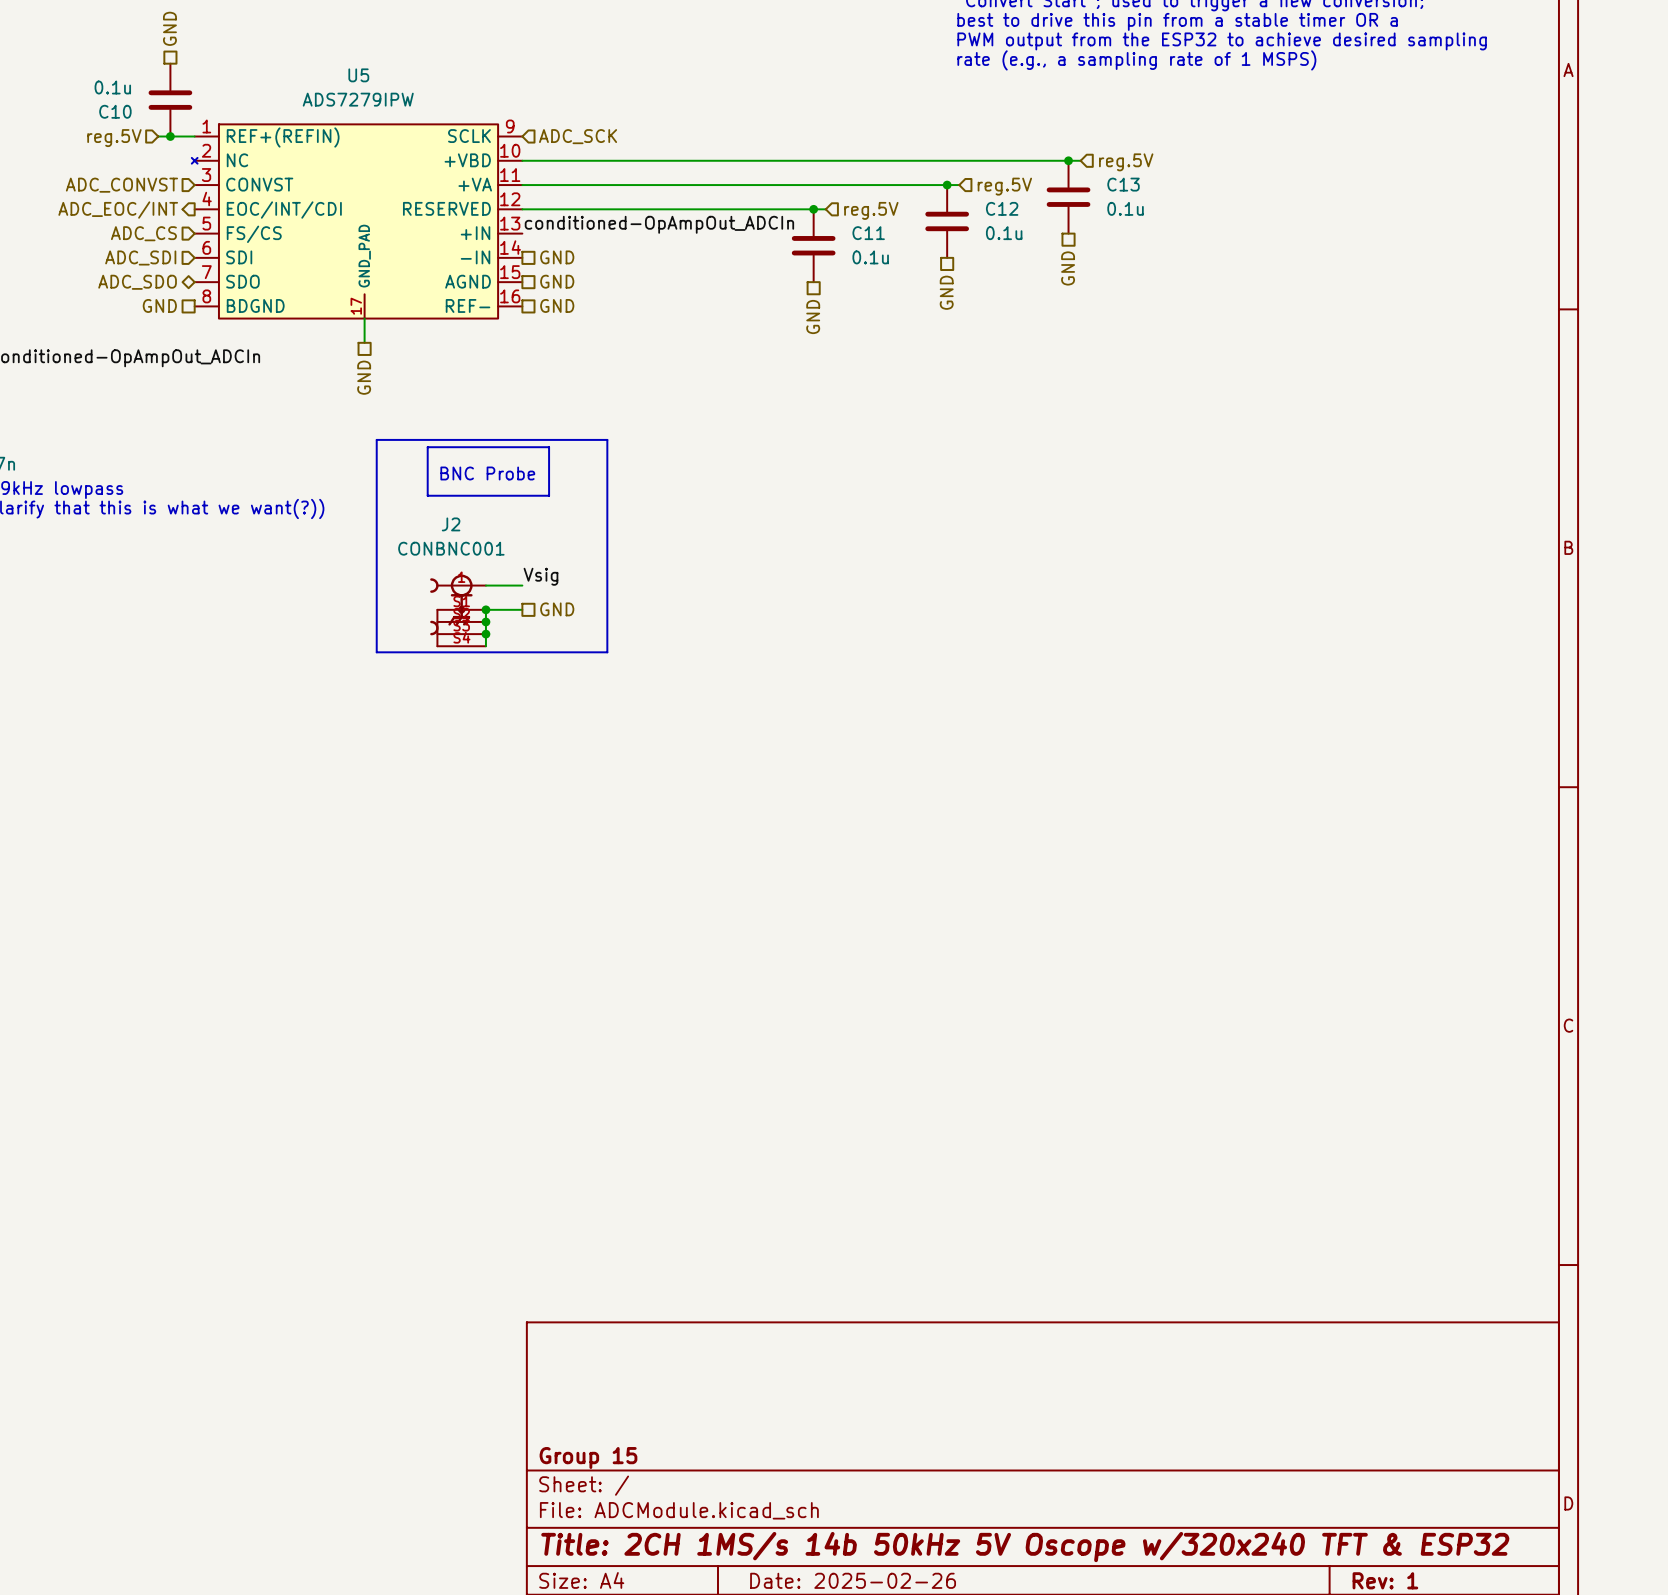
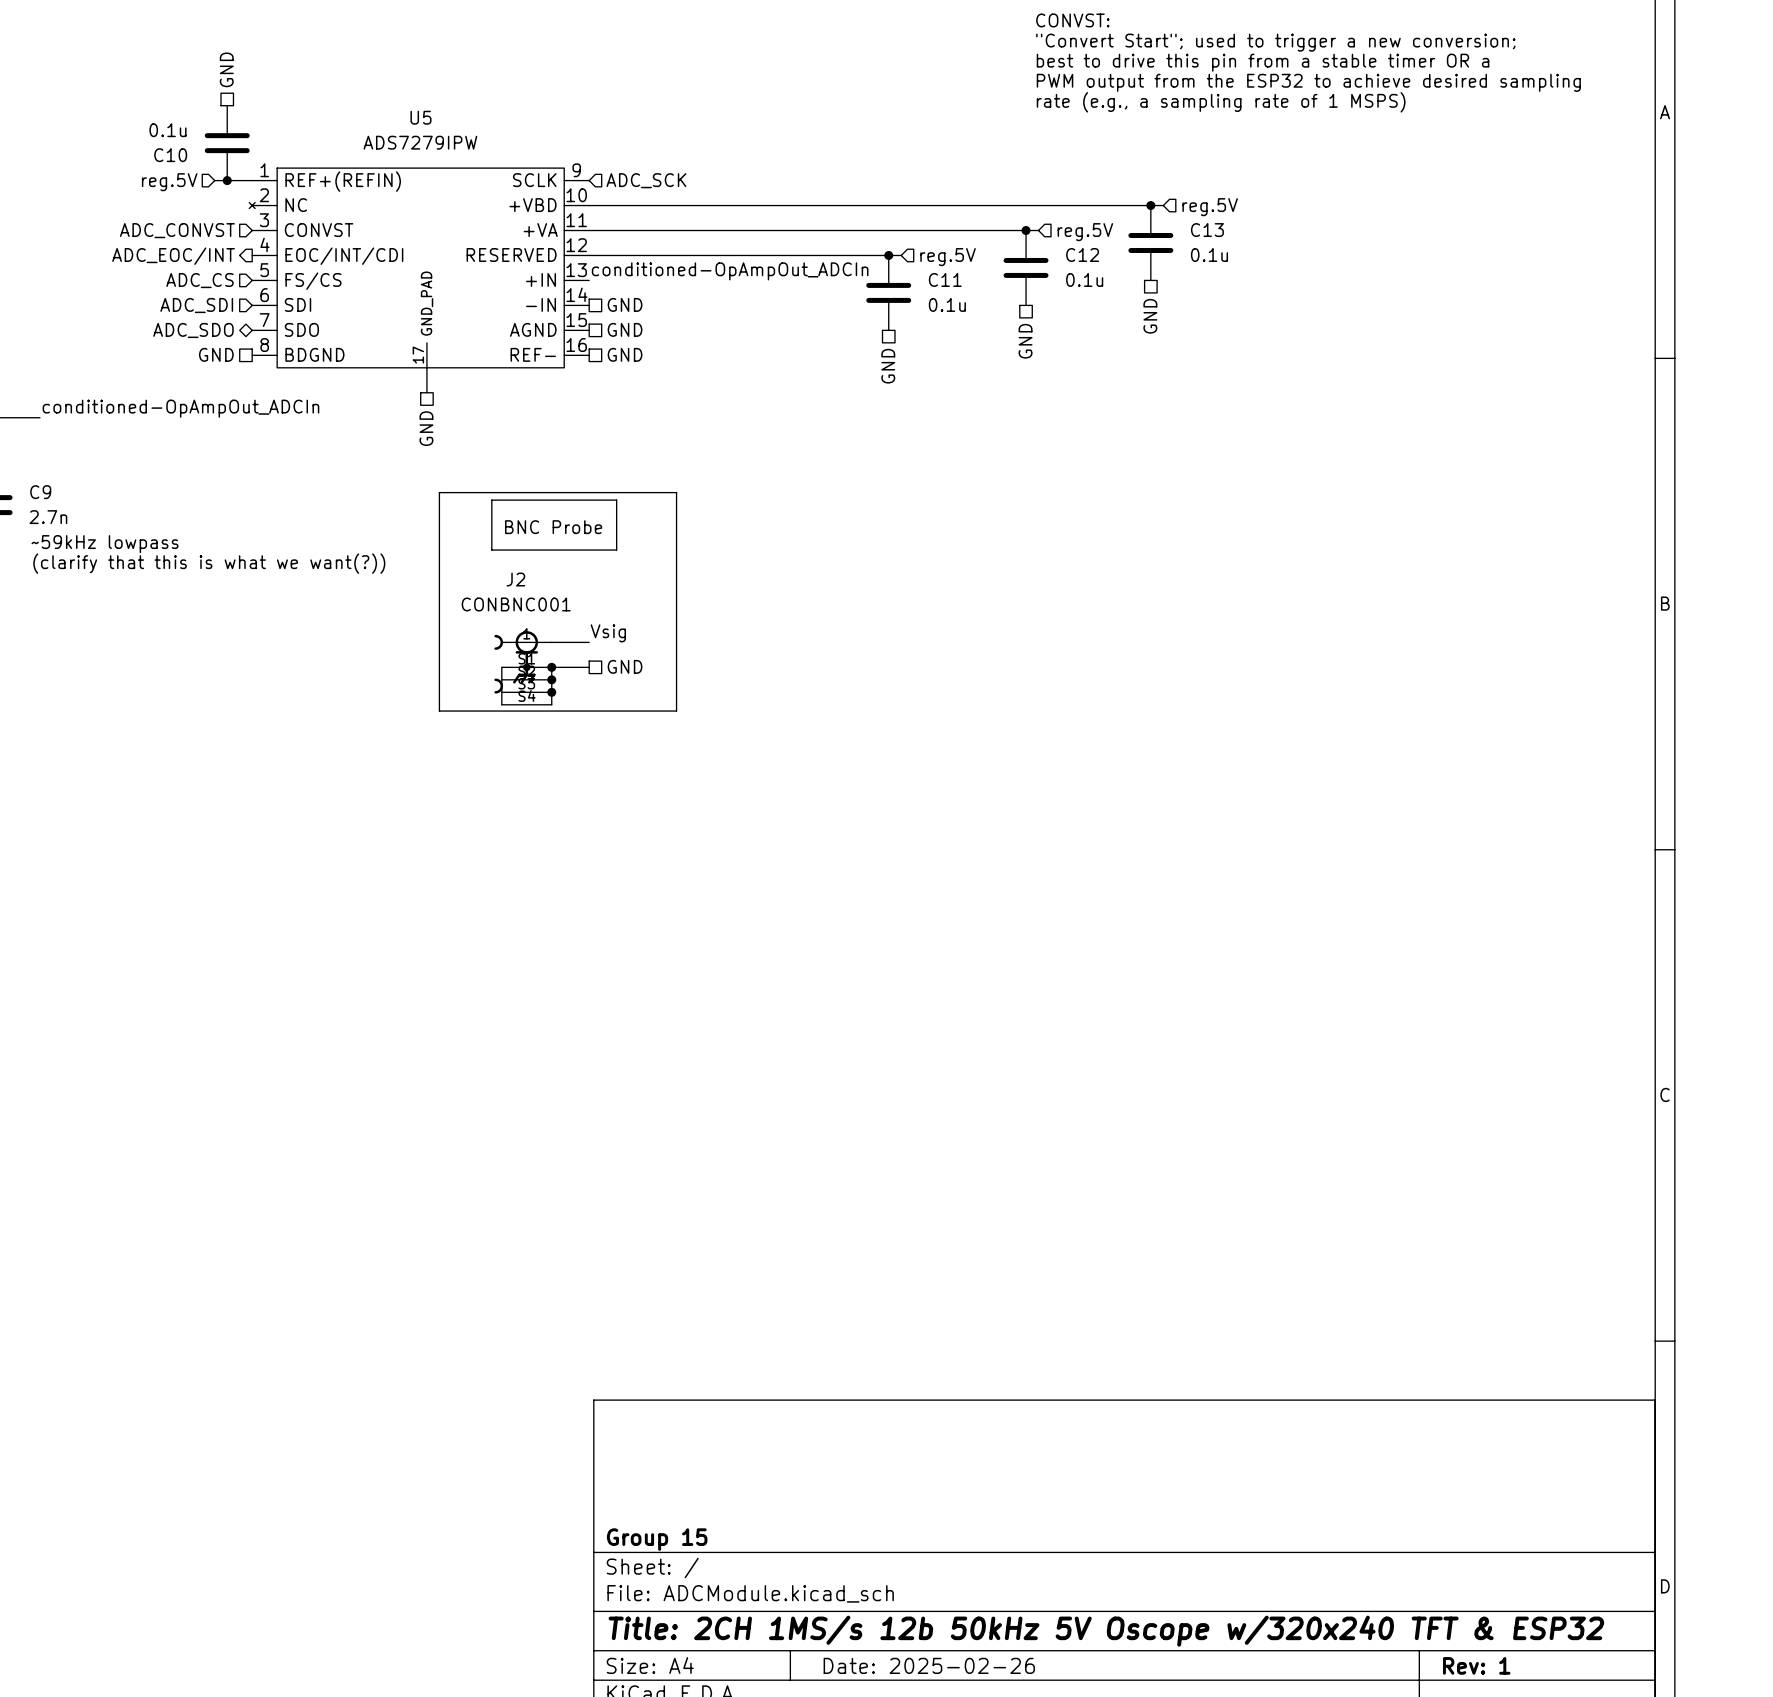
title block: Title: 2CH 1MS/s 14b 50kHz 5V Oscope w/320x240 TFT & ESP32 (1025, 1547) -> Title: 2CH 1MS/s 12b 50kHz 5V Oscope w/320x240 TFT & ESP32 (1106, 1631)

